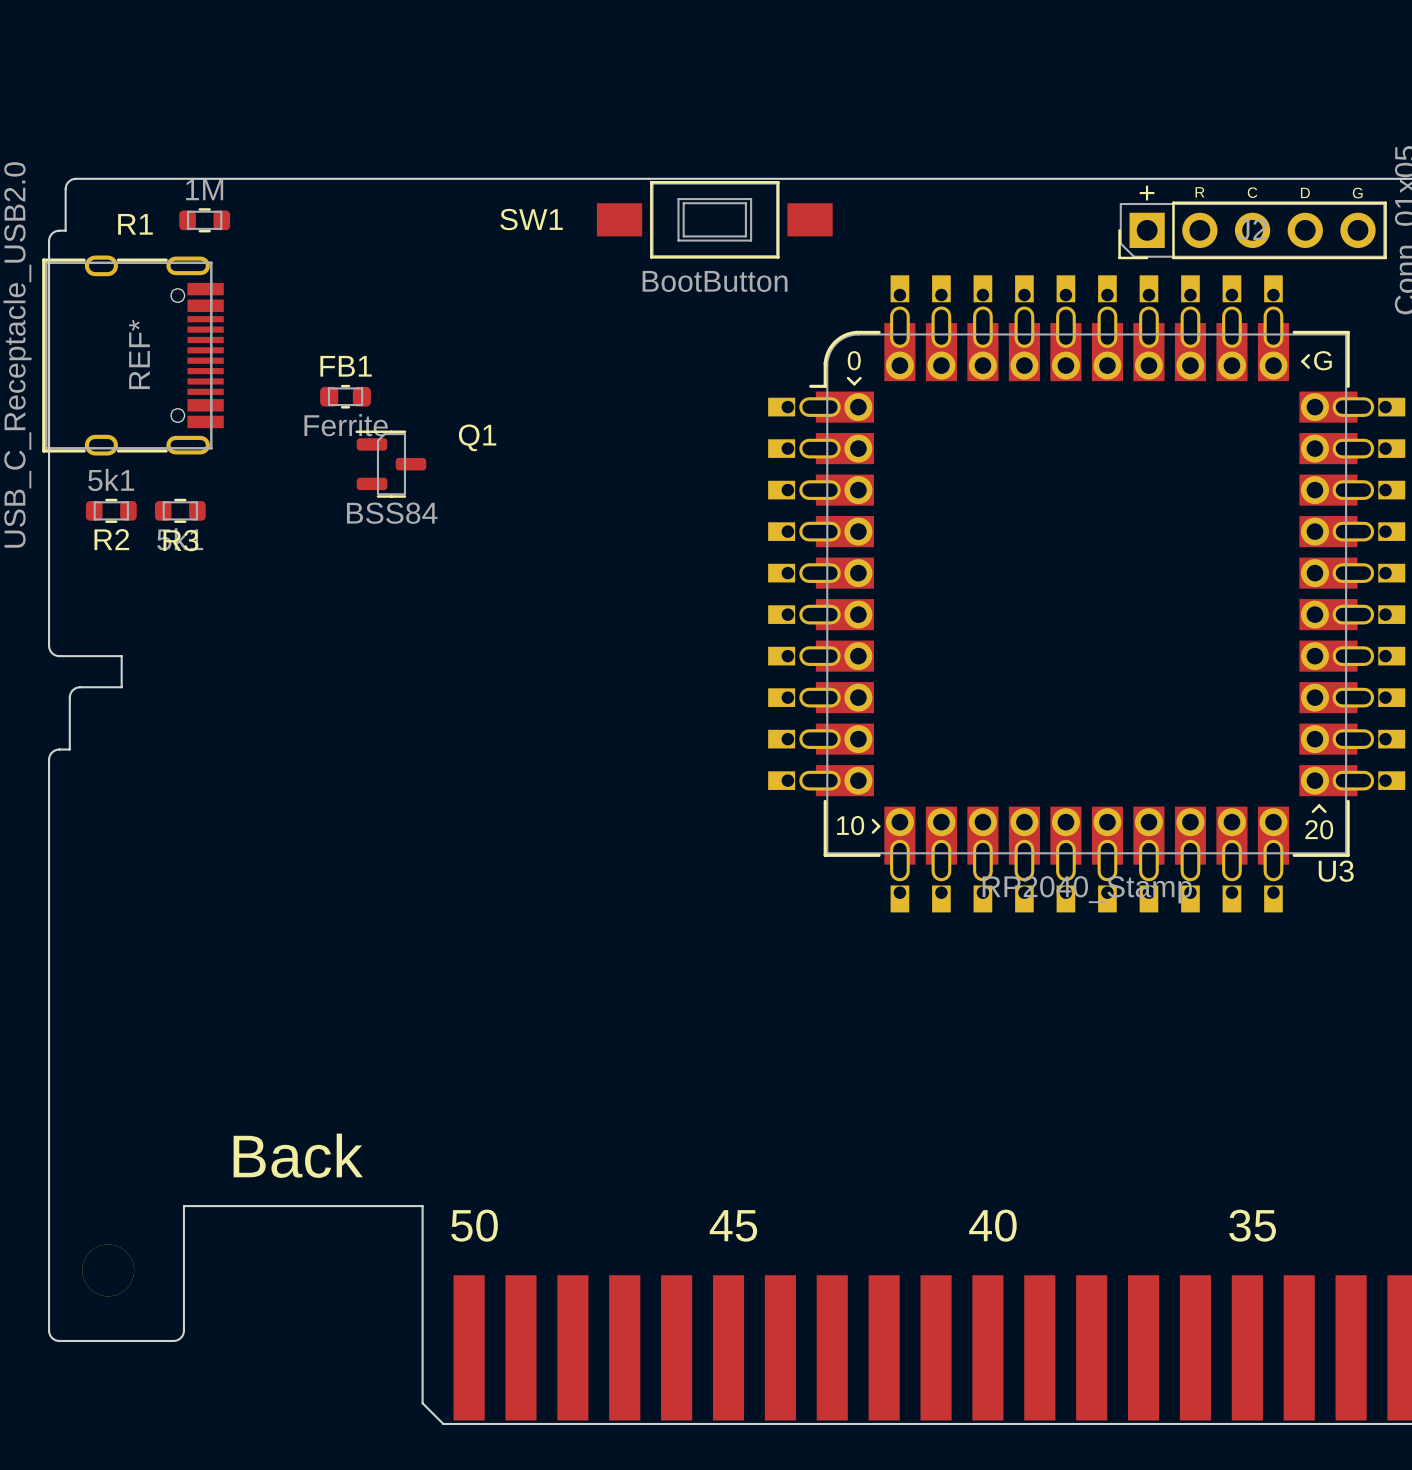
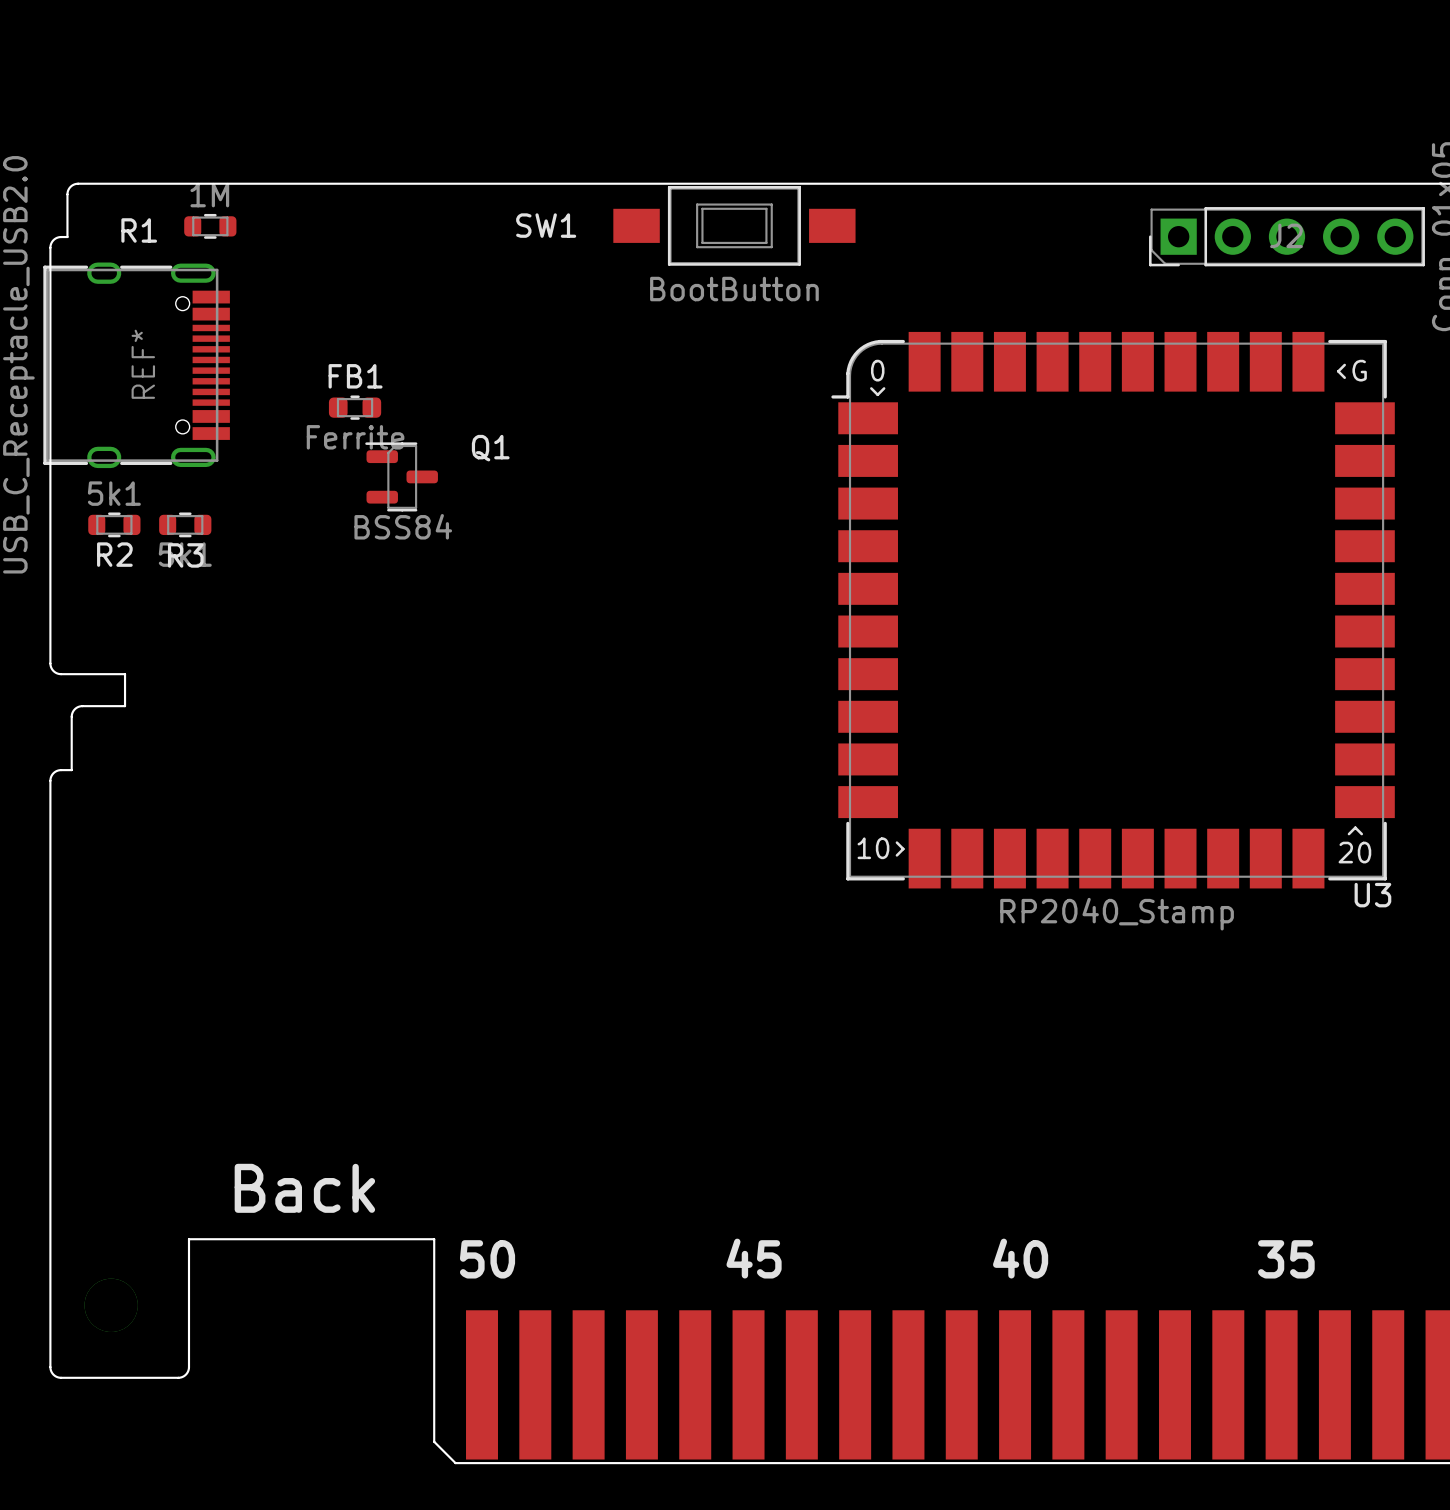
text: R (1200, 192) -> none
text: C (1252, 192) -> none
text: D (1305, 192) -> none
text: + (1147, 193) -> none
text: G (1357, 193) -> none
U3 footprint: [768, 275, 1406, 913] -> [831, 331, 1395, 889]

